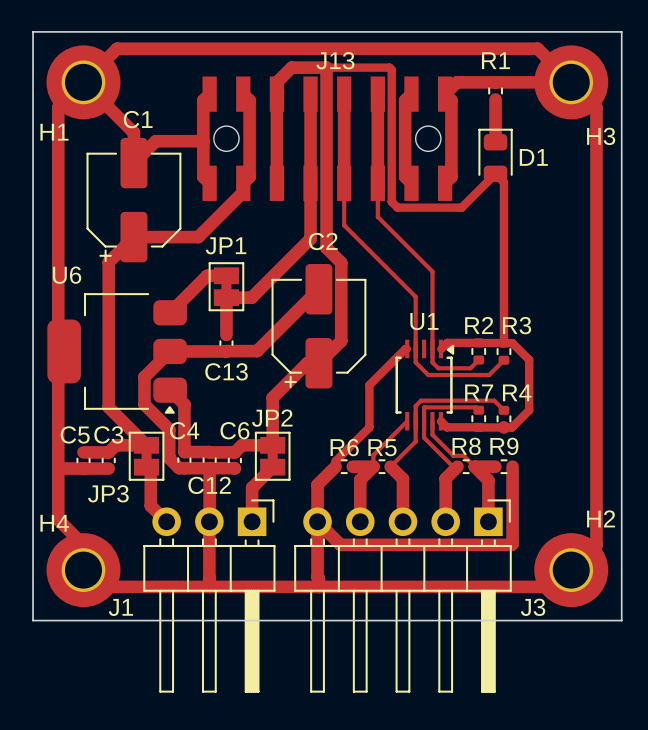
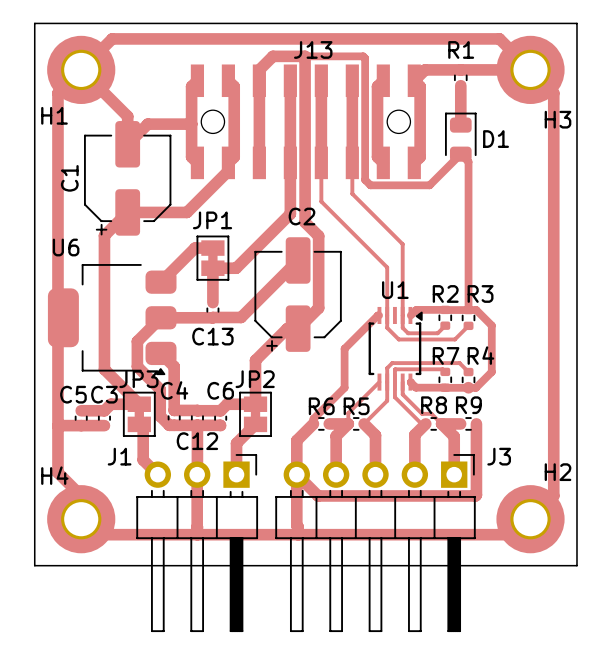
C1 name rotation: 0° (138, 119) -> 90° counterclockwise (69, 178)
C1 name position: C1 (138, 119) -> C1 (69, 178)
JP3 name position: JP3 (108, 493) -> JP3 (138, 379)
J1 name position: J1 (120, 607) -> J1 (119, 456)
J3 name position: J3 (533, 607) -> J3 (499, 456)

